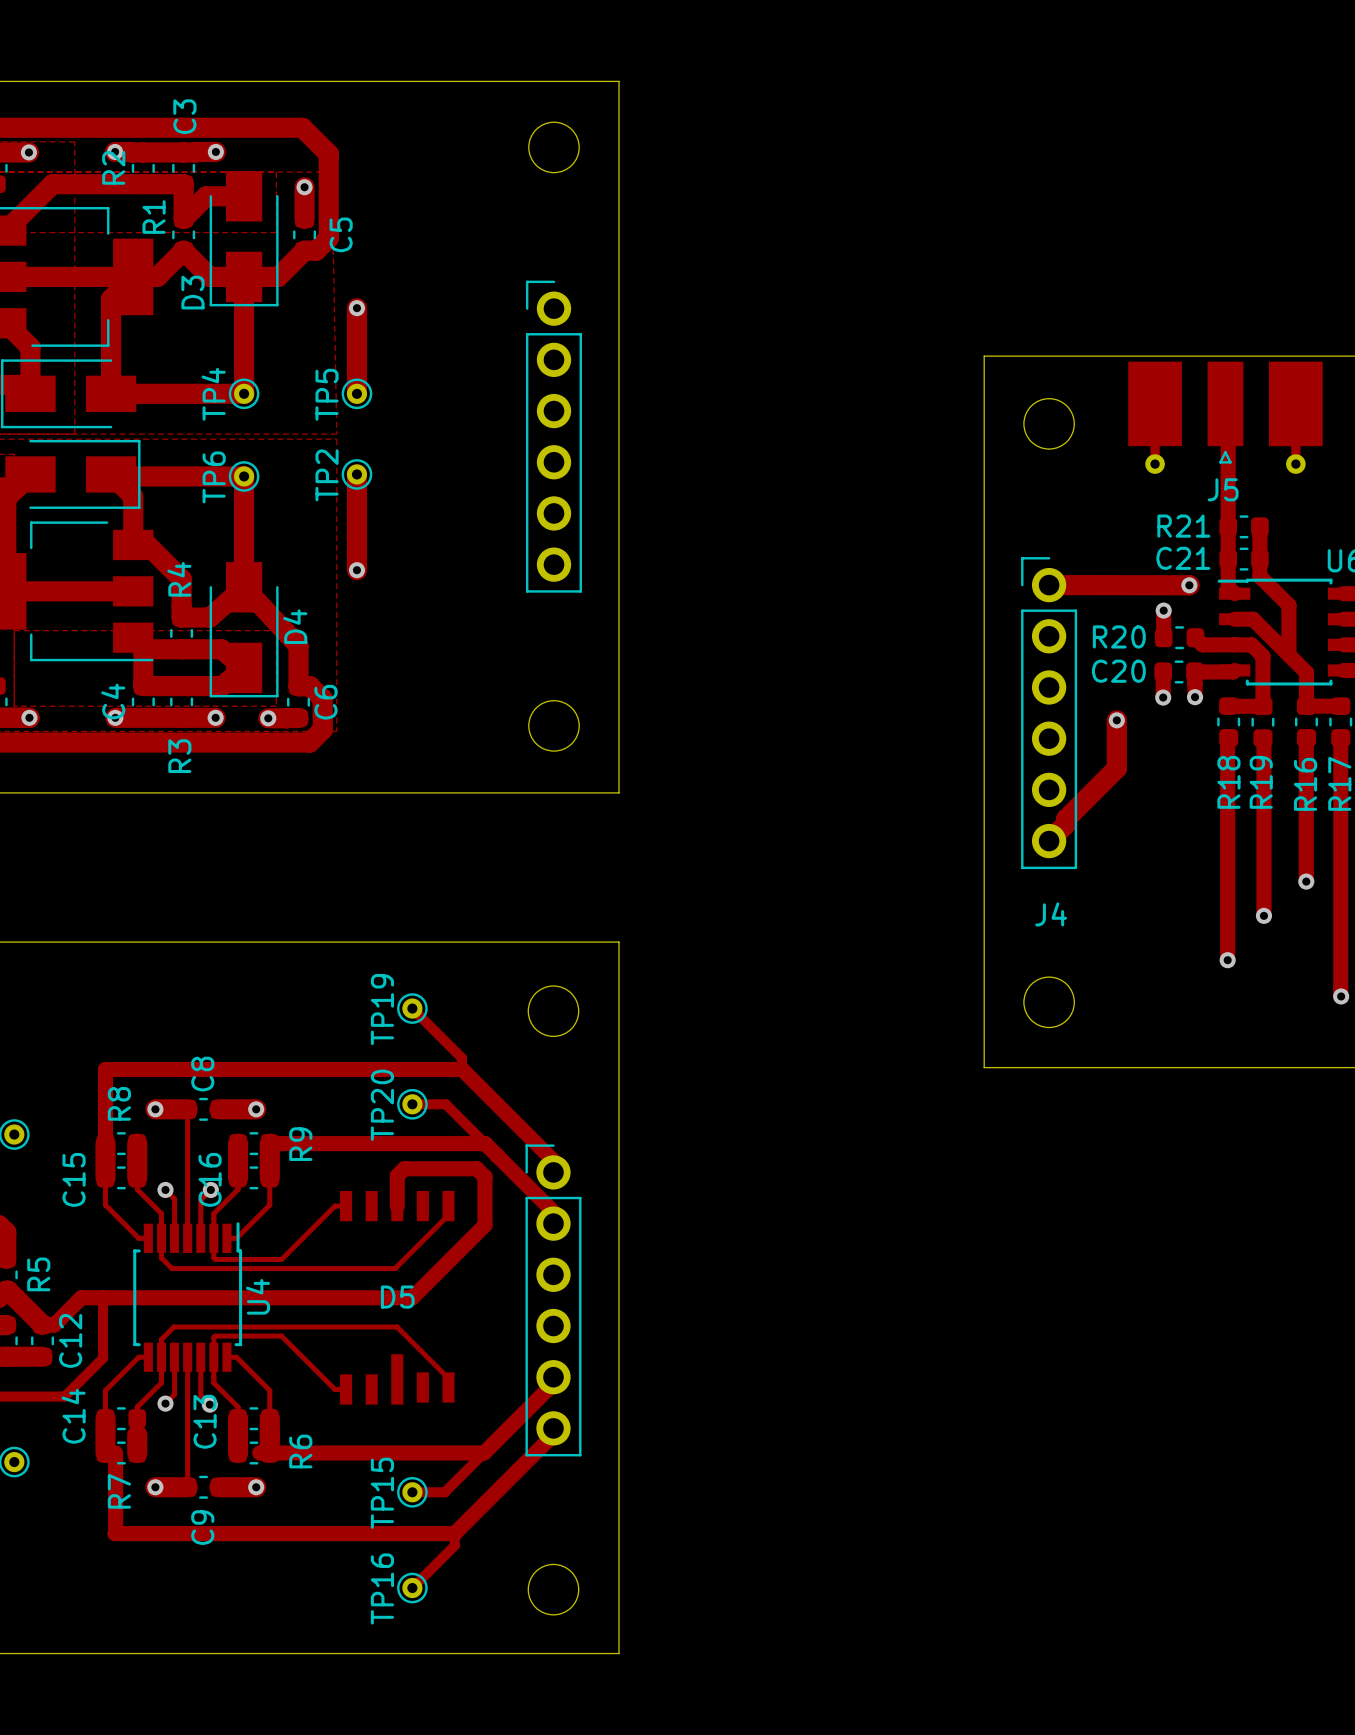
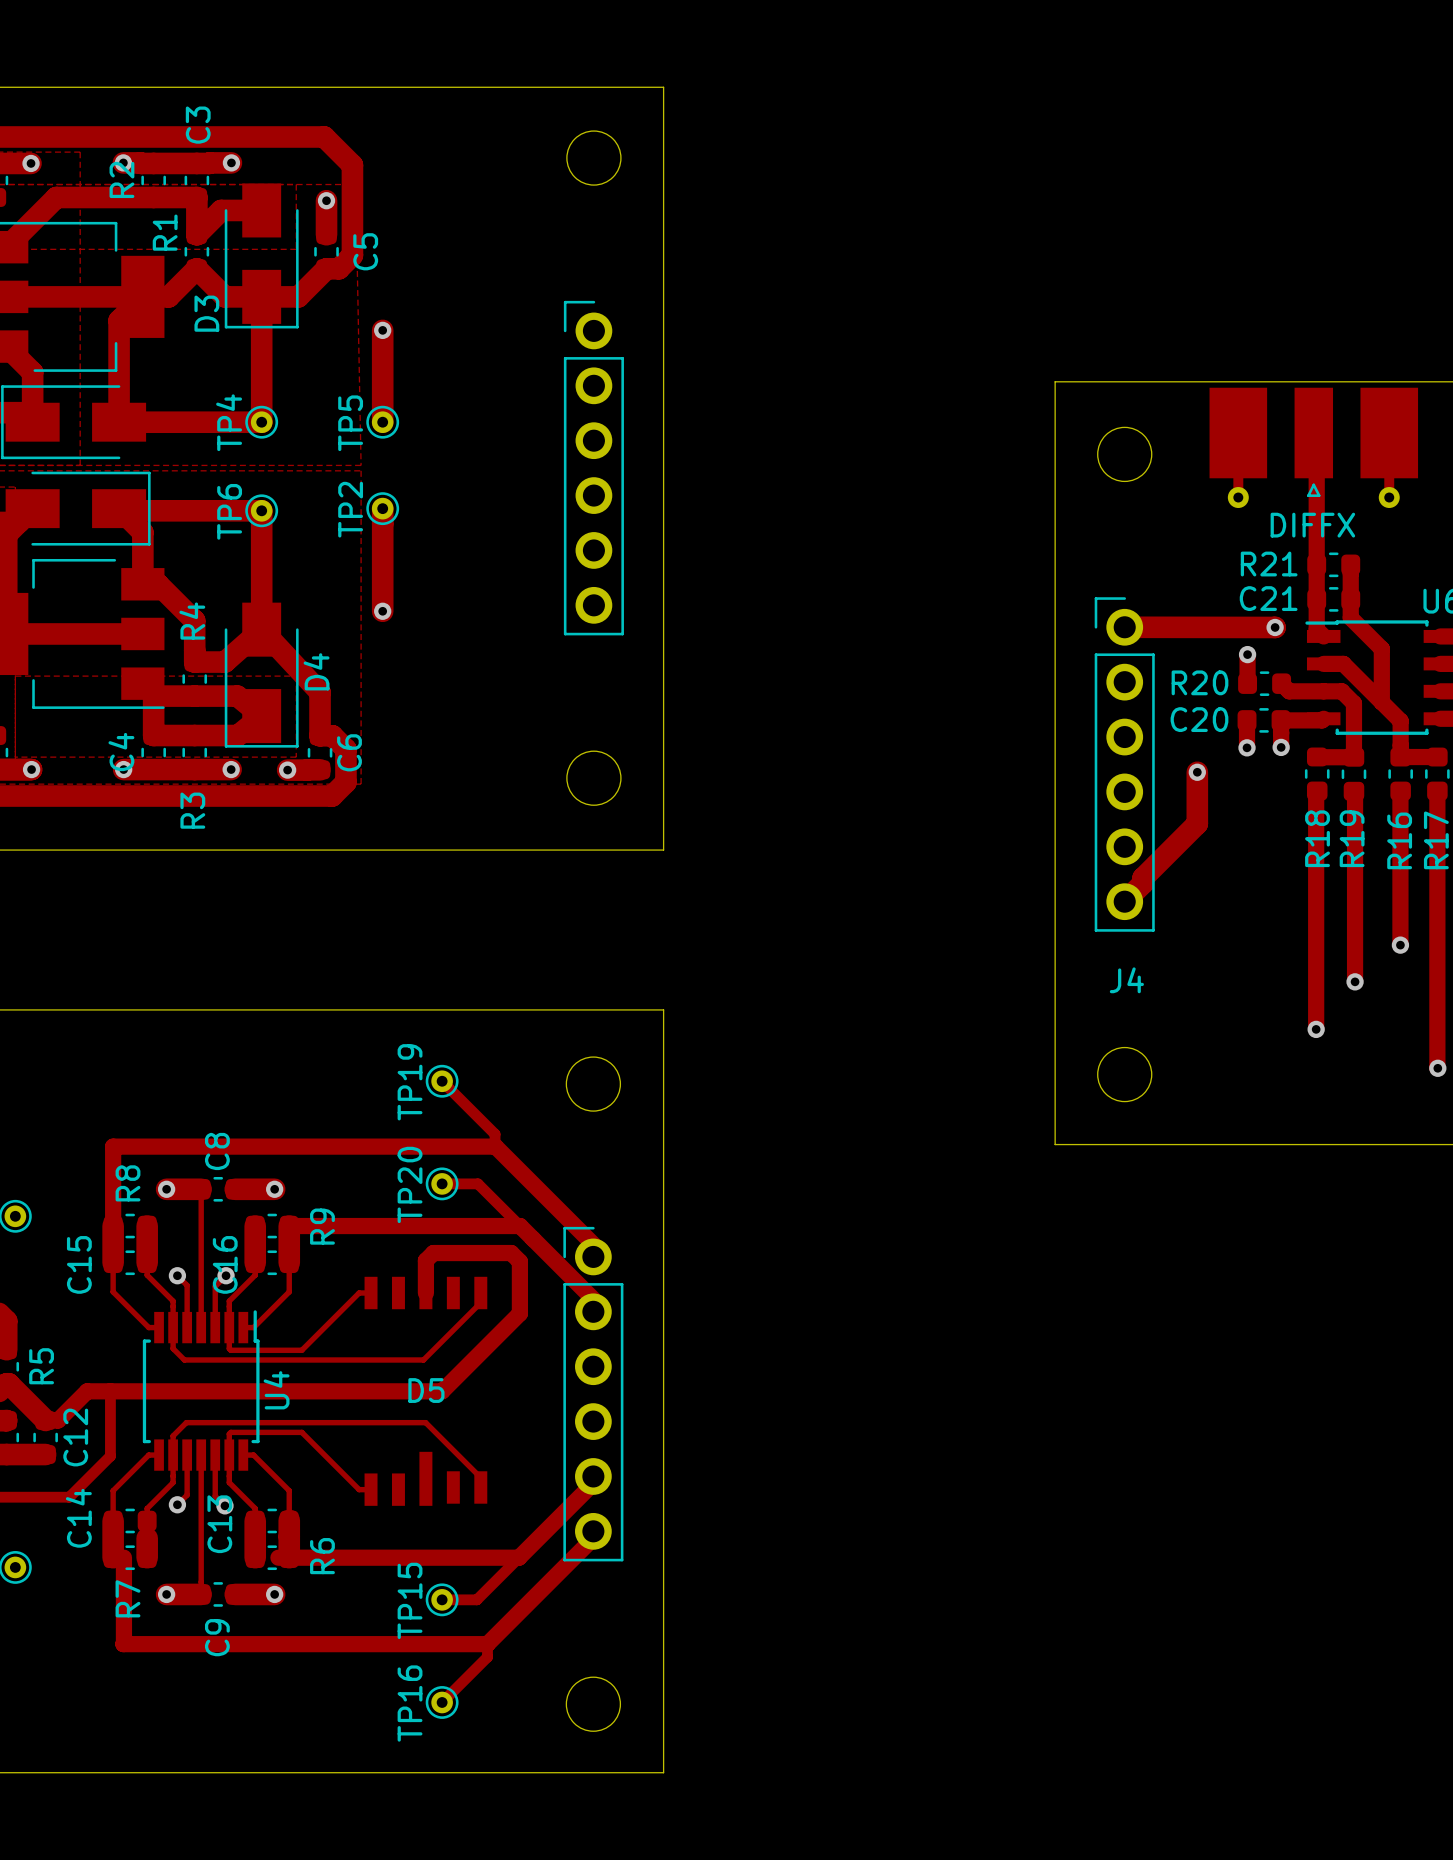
J5 name: J5 (1223, 489) -> DIFFX (1312, 525)

